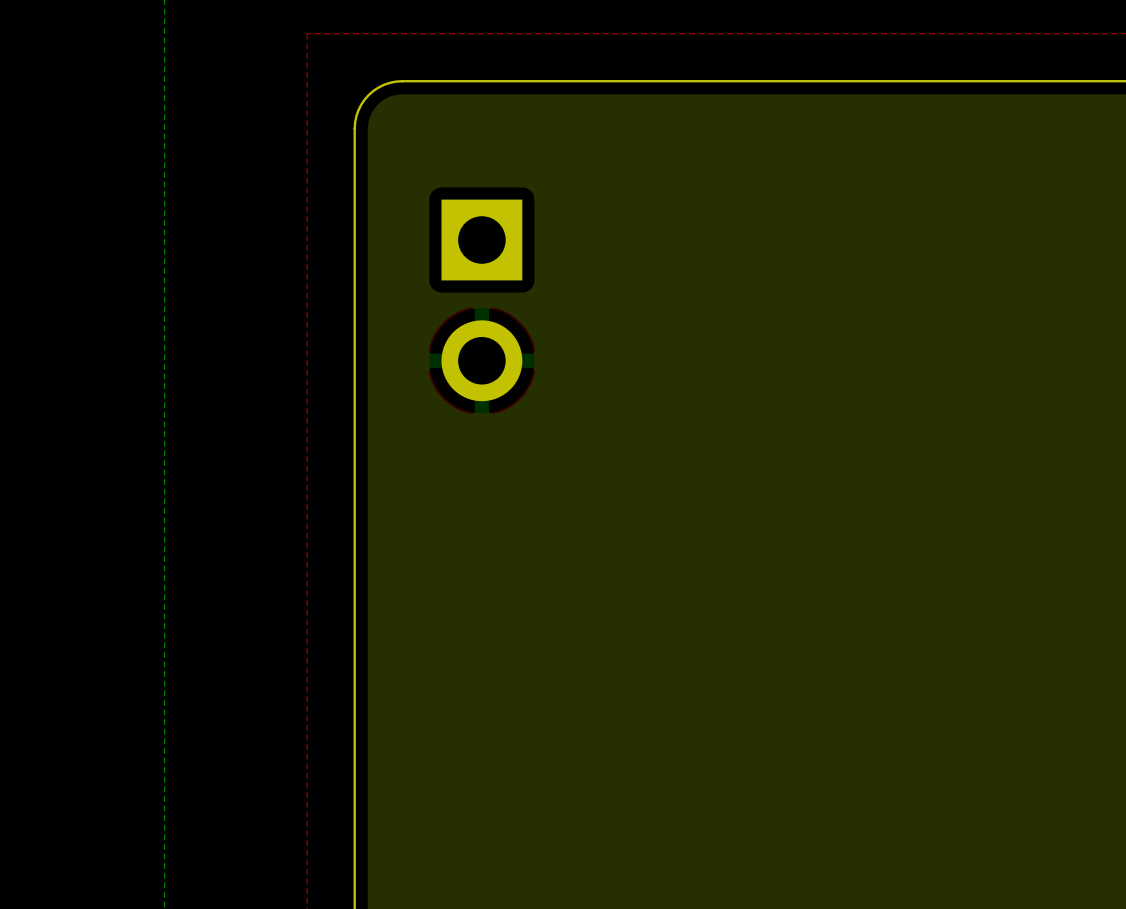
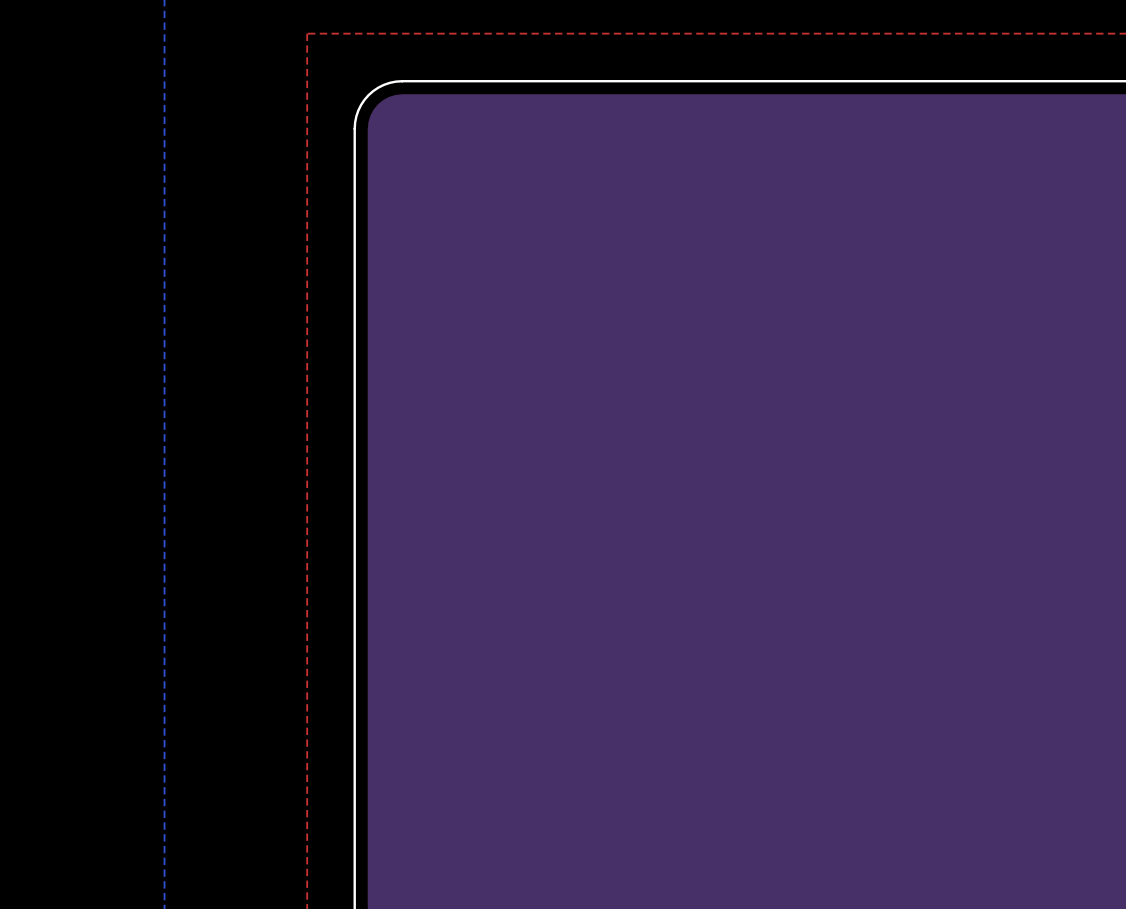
part: (481, 300) -> none

